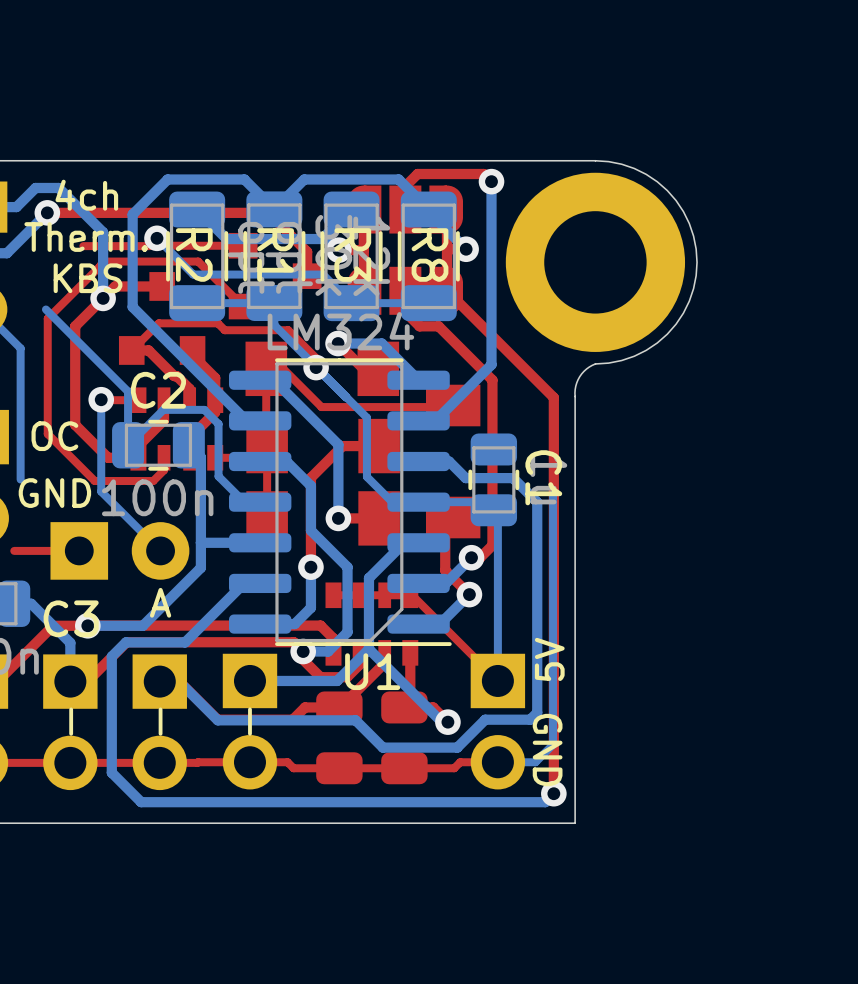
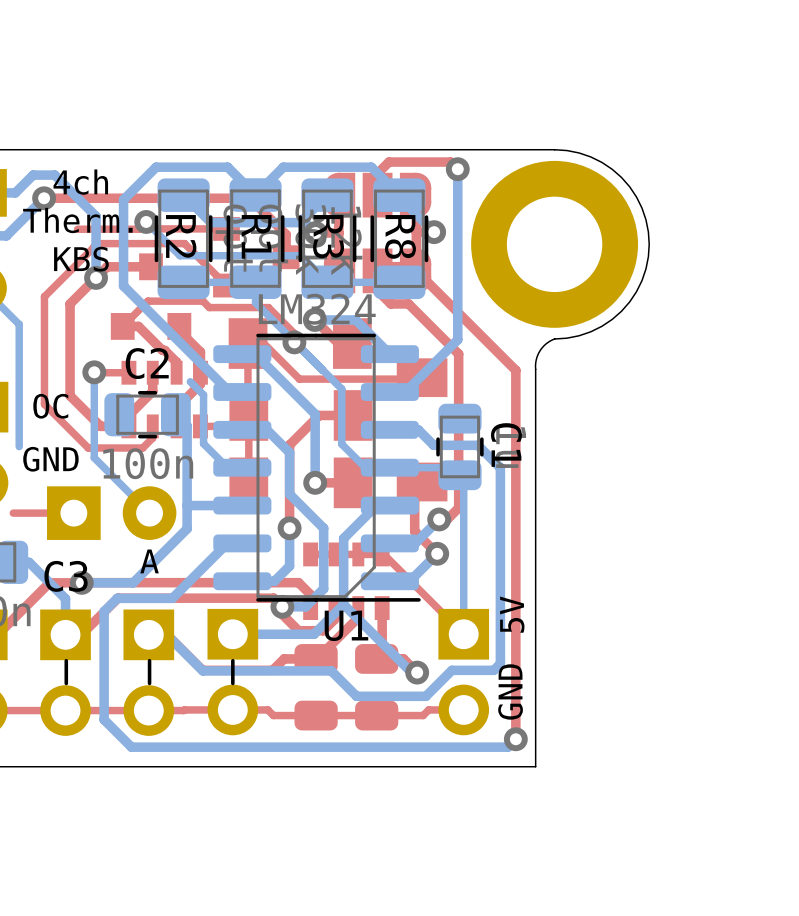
bottom track: (45, 309) (128, 391) (128, 445) (163, 409) (204, 409) -> none
bottom track: (553, 494) (553, 744) (535, 762) (497, 762) -> none
text rotation: 0° (547, 750) -> 180° (510, 691)

